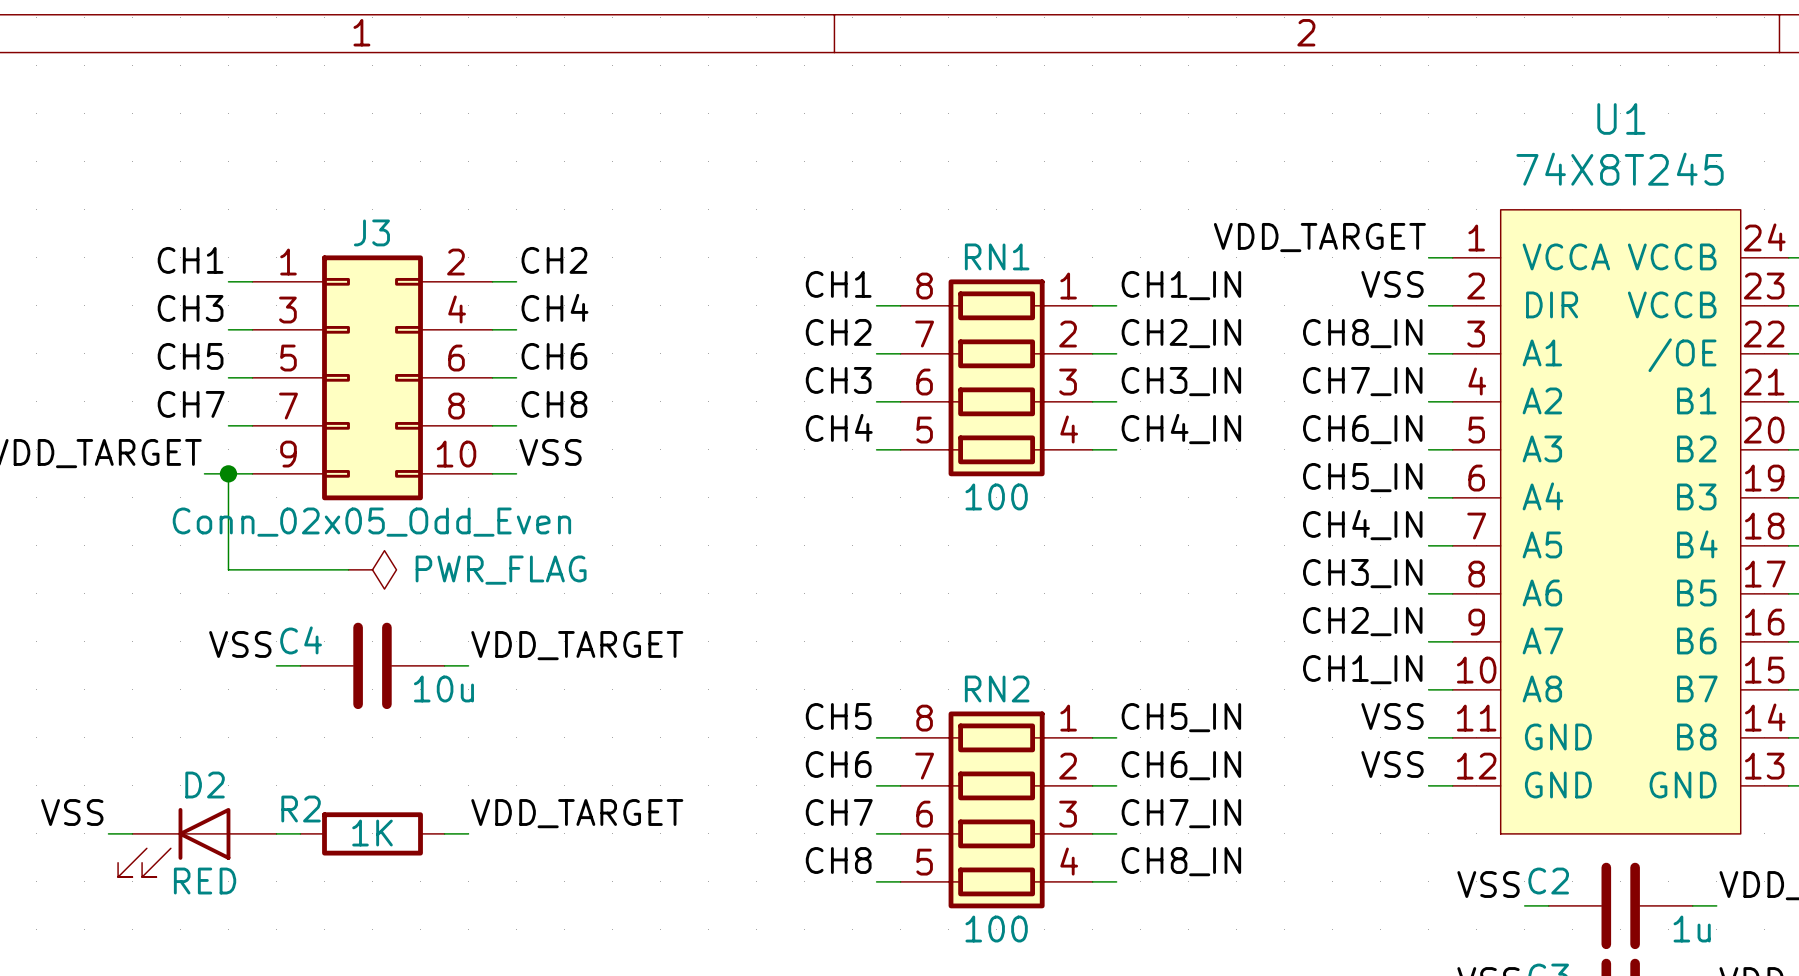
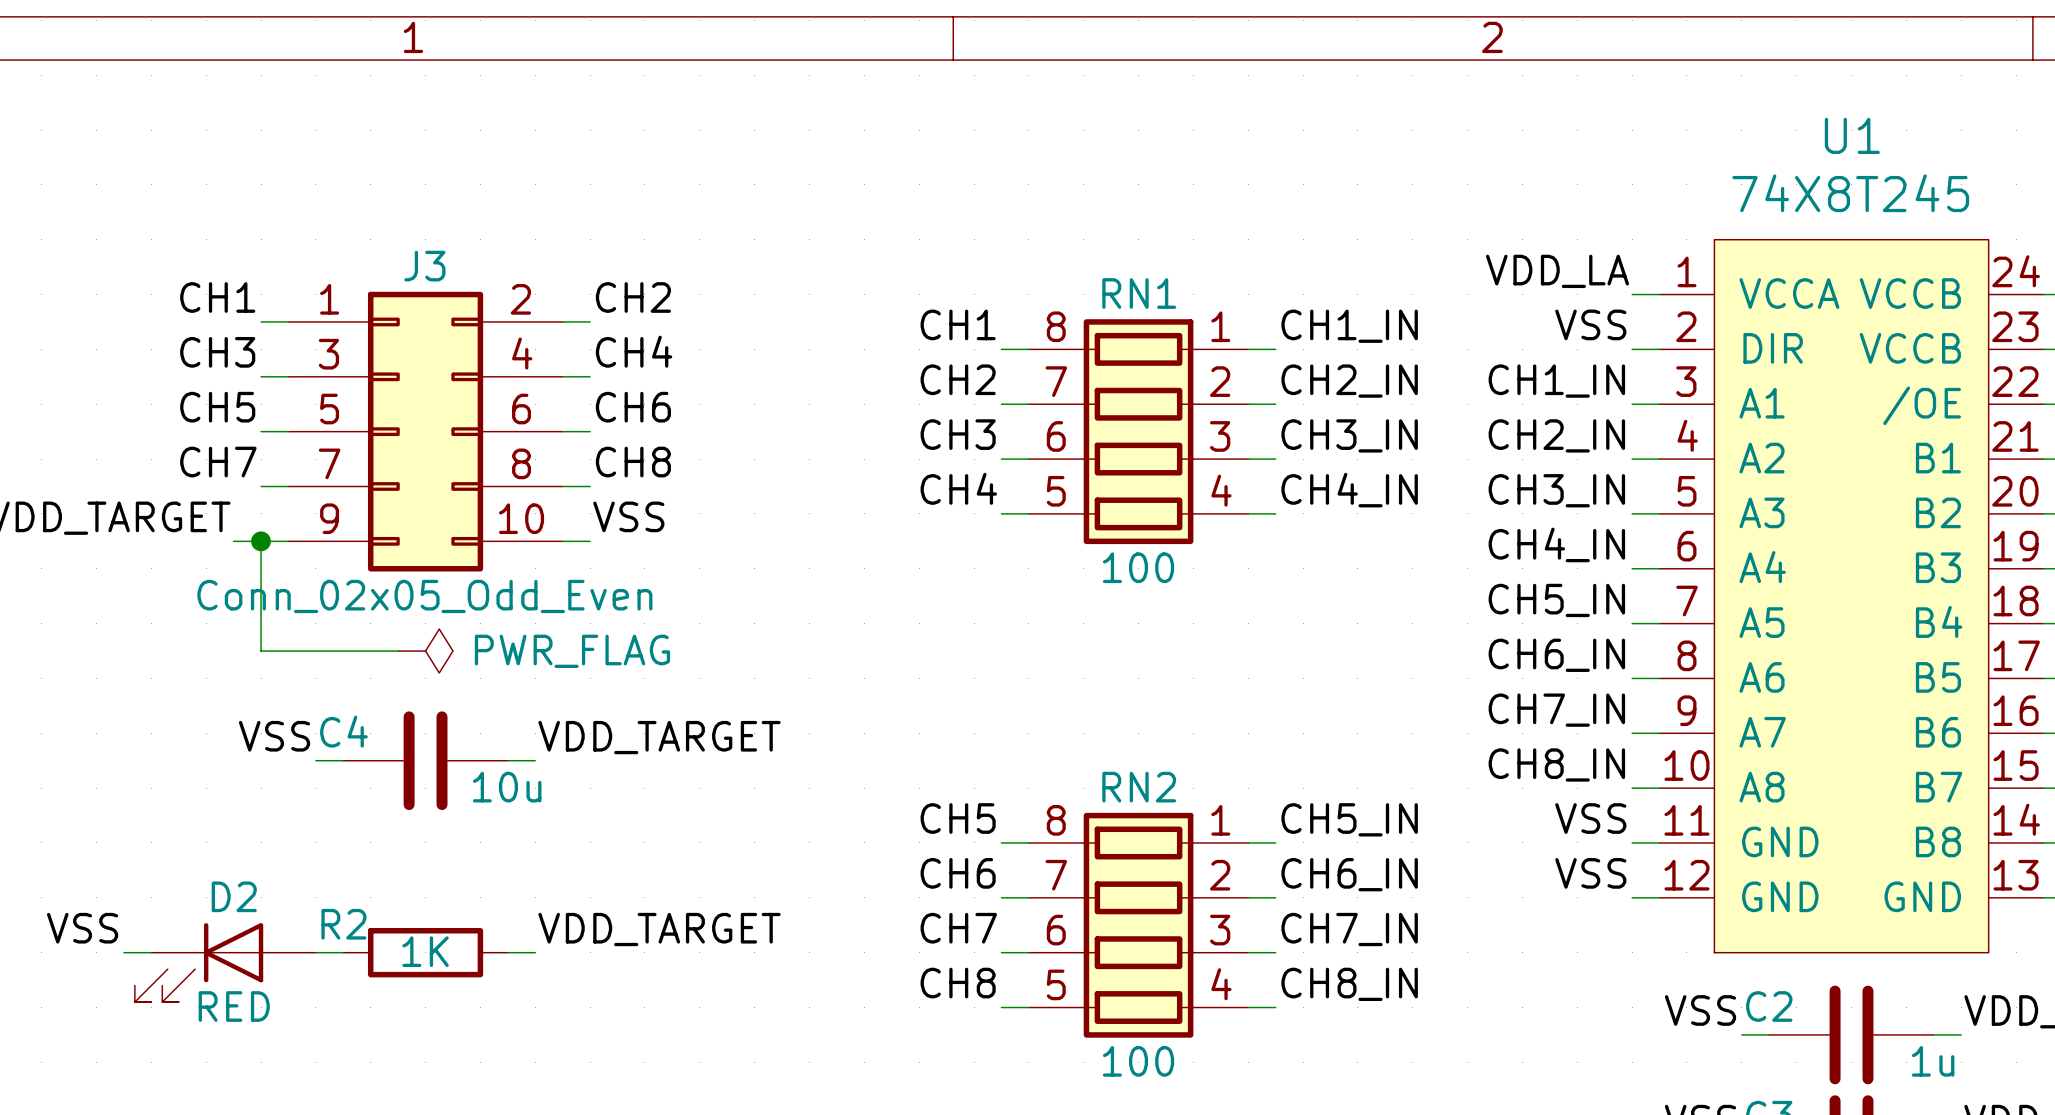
label: VDD_TARGET (1319, 237) -> VDD_LA (1557, 271)
label: CH8_IN (1362, 333) -> CH1_IN (1556, 381)
label: CH7_IN (1362, 381) -> CH2_IN (1556, 435)
label: CH6_IN (1362, 429) -> CH3_IN (1556, 490)
label: CH5_IN (1362, 477) -> CH4_IN (1556, 544)
label: CH4_IN (1362, 525) -> CH5_IN (1556, 600)
label: CH3_IN (1362, 573) -> CH6_IN (1556, 655)
label: CH2_IN (1362, 621) -> CH7_IN (1556, 710)
label: CH1_IN (1362, 669) -> CH8_IN (1556, 764)

